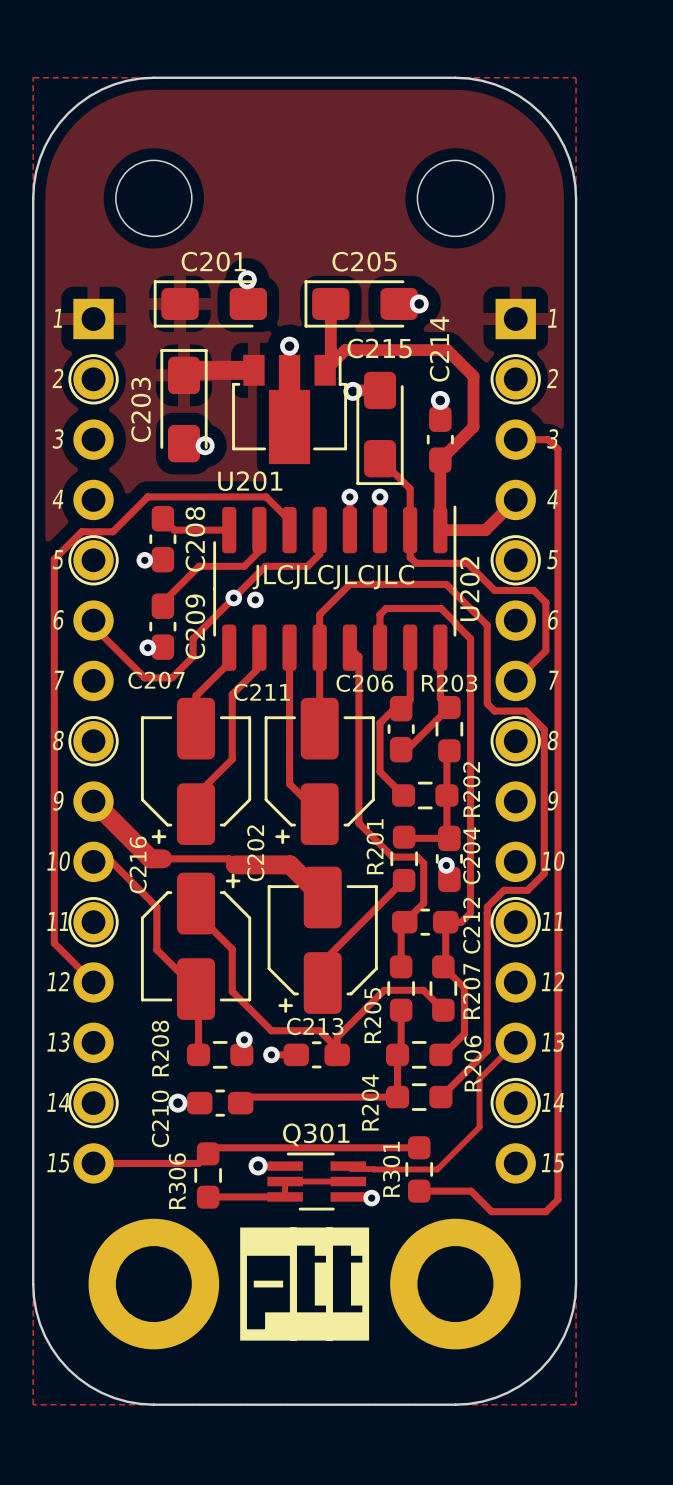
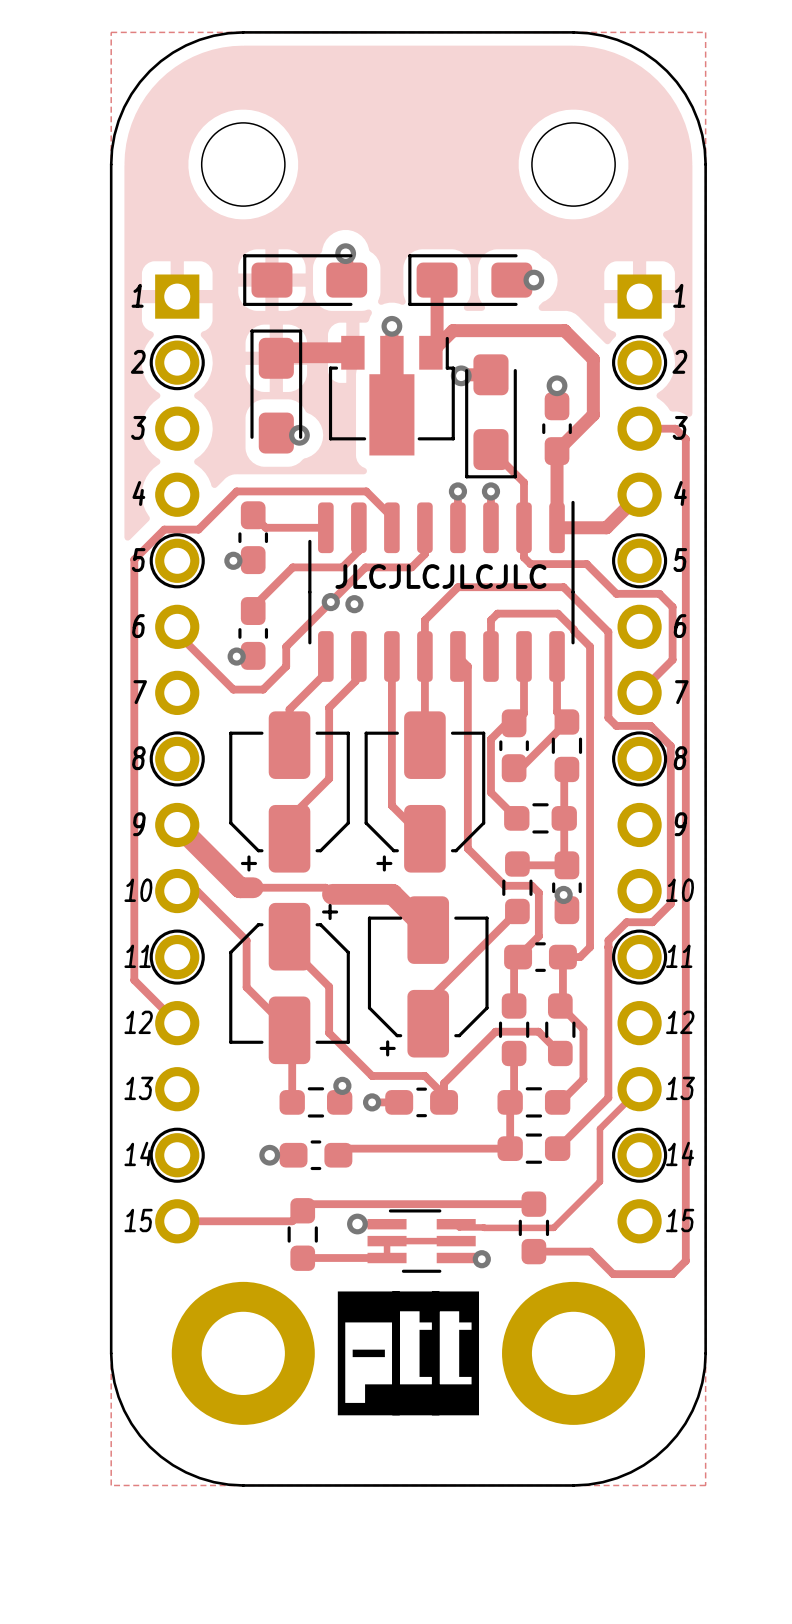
C201 name: C201 (213, 261) -> none
C205 name: C205 (364, 261) -> none
C215 name: C215 (379, 348) -> none
C214 name: C214 (439, 349) -> none
C203 name: C203 (141, 409) -> none
U201 name: U201 (250, 481) -> none
C208 name: C208 (195, 539) -> none
U202 name: U202 (469, 589) -> none
C209 name: C209 (195, 626) -> none
C207 name: C207 (156, 680) -> none
C206 name: C206 (364, 683) -> none
R203 name: R203 (449, 683) -> none
C211 name: C211 (262, 692) -> none
R202 name: R202 (471, 789) -> none
R201 name: R201 (375, 846) -> none
C202 name: C202 (255, 853) -> none
C204 name: C204 (471, 855) -> none
C216 name: C216 (138, 864) -> none
C212 name: C212 (471, 925) -> none
R207 name: R207 (471, 991) -> none
R205 name: R205 (372, 1015) -> none
C213 name: C213 (315, 1026) -> none
R208 name: R208 (160, 1048) -> none
R206 name: R206 (472, 1063) -> none
R204 name: R204 (370, 1102) -> none
C210 name: C210 (160, 1118) -> none
Q301 name: Q301 (316, 1134) -> none
R301 name: R301 (391, 1169) -> none
R306 name: R306 (177, 1181) -> none

